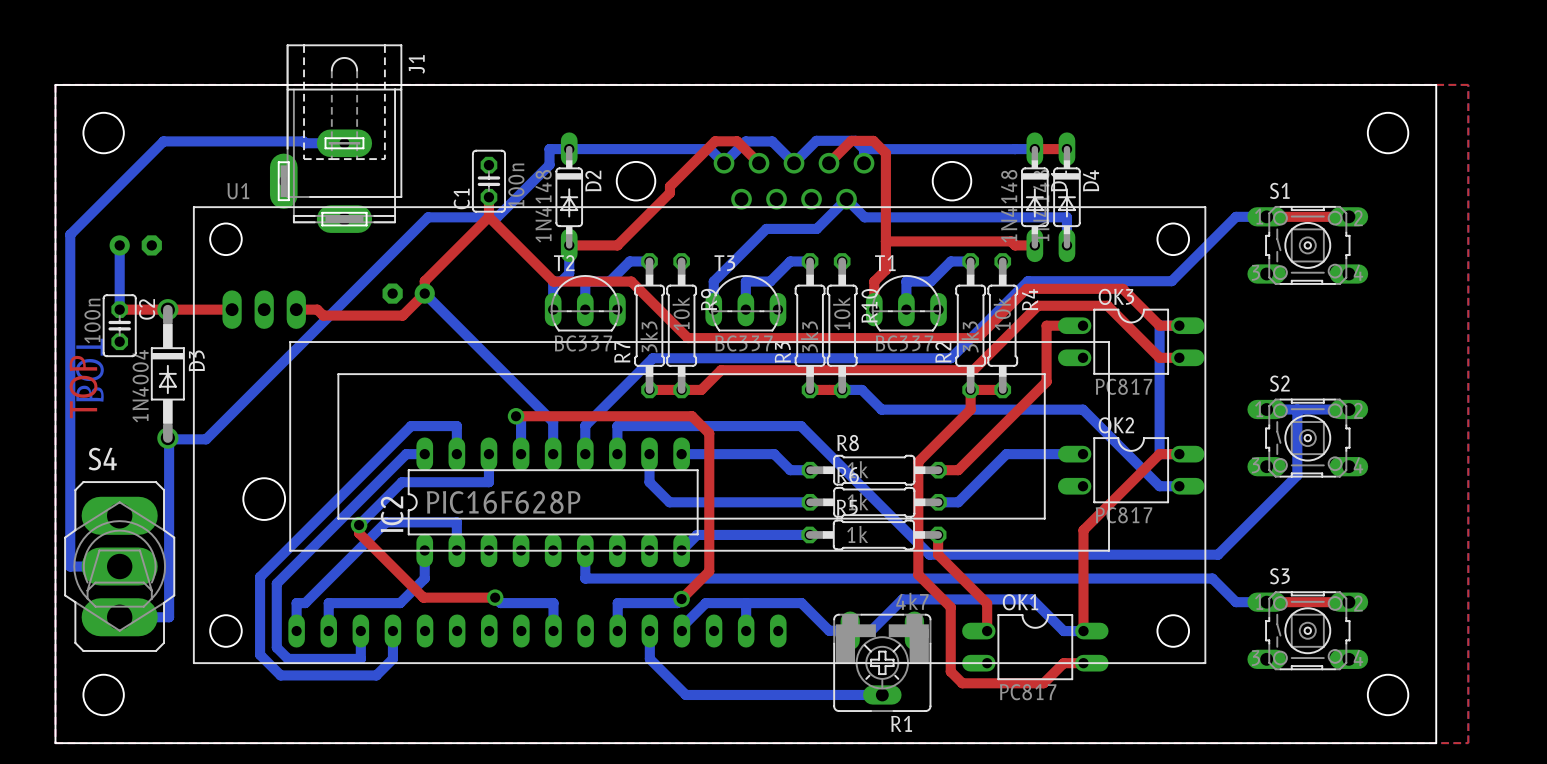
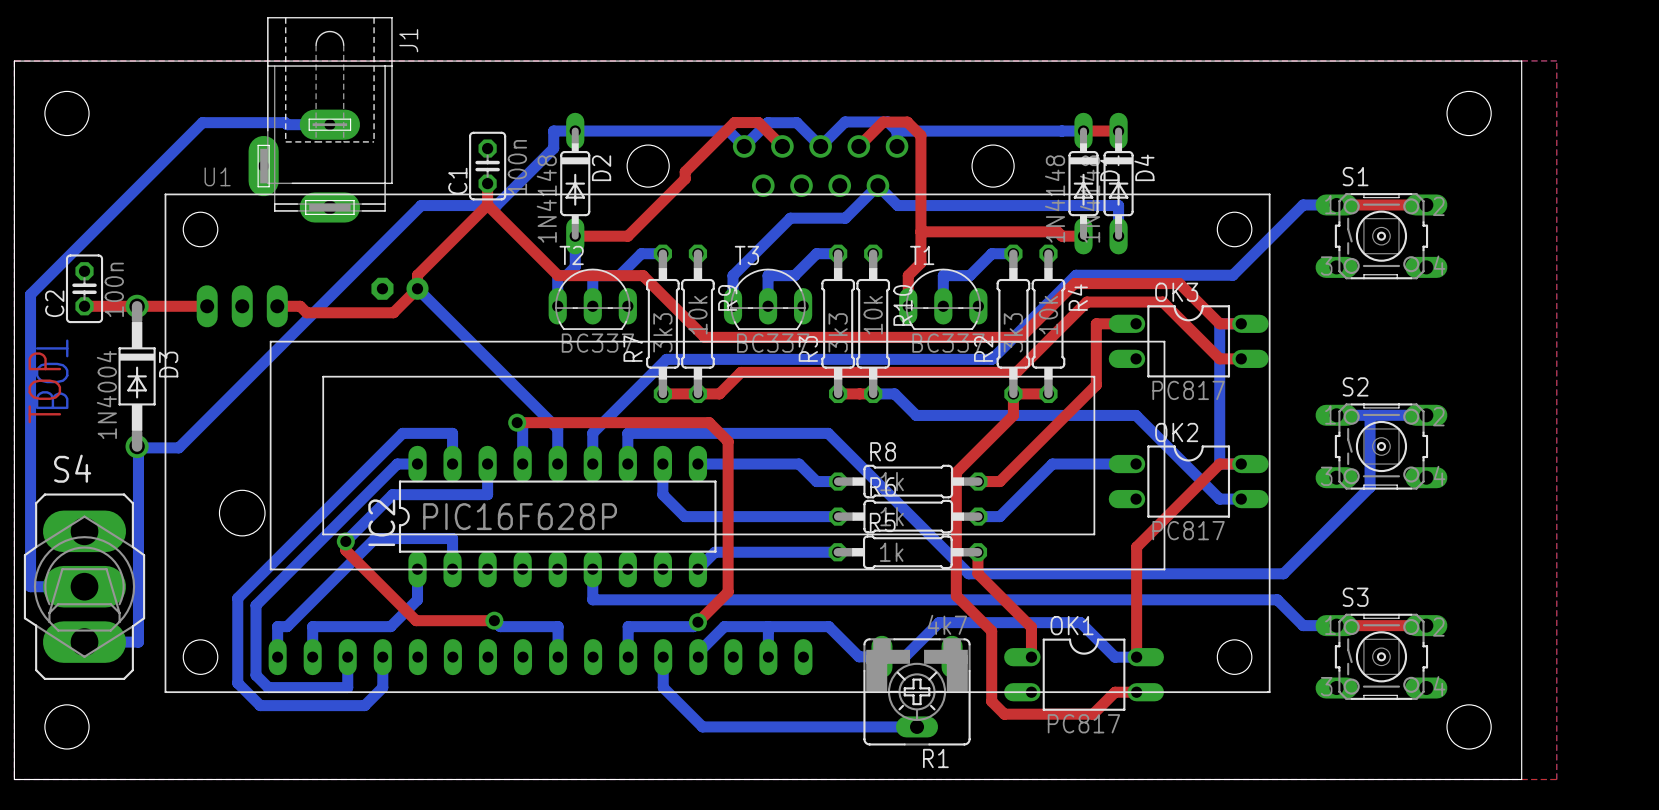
bottom track: (227, 141) (163, 141) (70, 234) (70, 298) -> (202, 122) (30, 294)
bottom track: (119, 245) (119, 309) -> none
part: (135, 245) -> none
C2 name position: C2 (147, 309) -> C2 (54, 303)
C2 value position: 100n (92, 321) -> 100n (114, 289)
C2 position: (119, 325) -> (84, 288)

